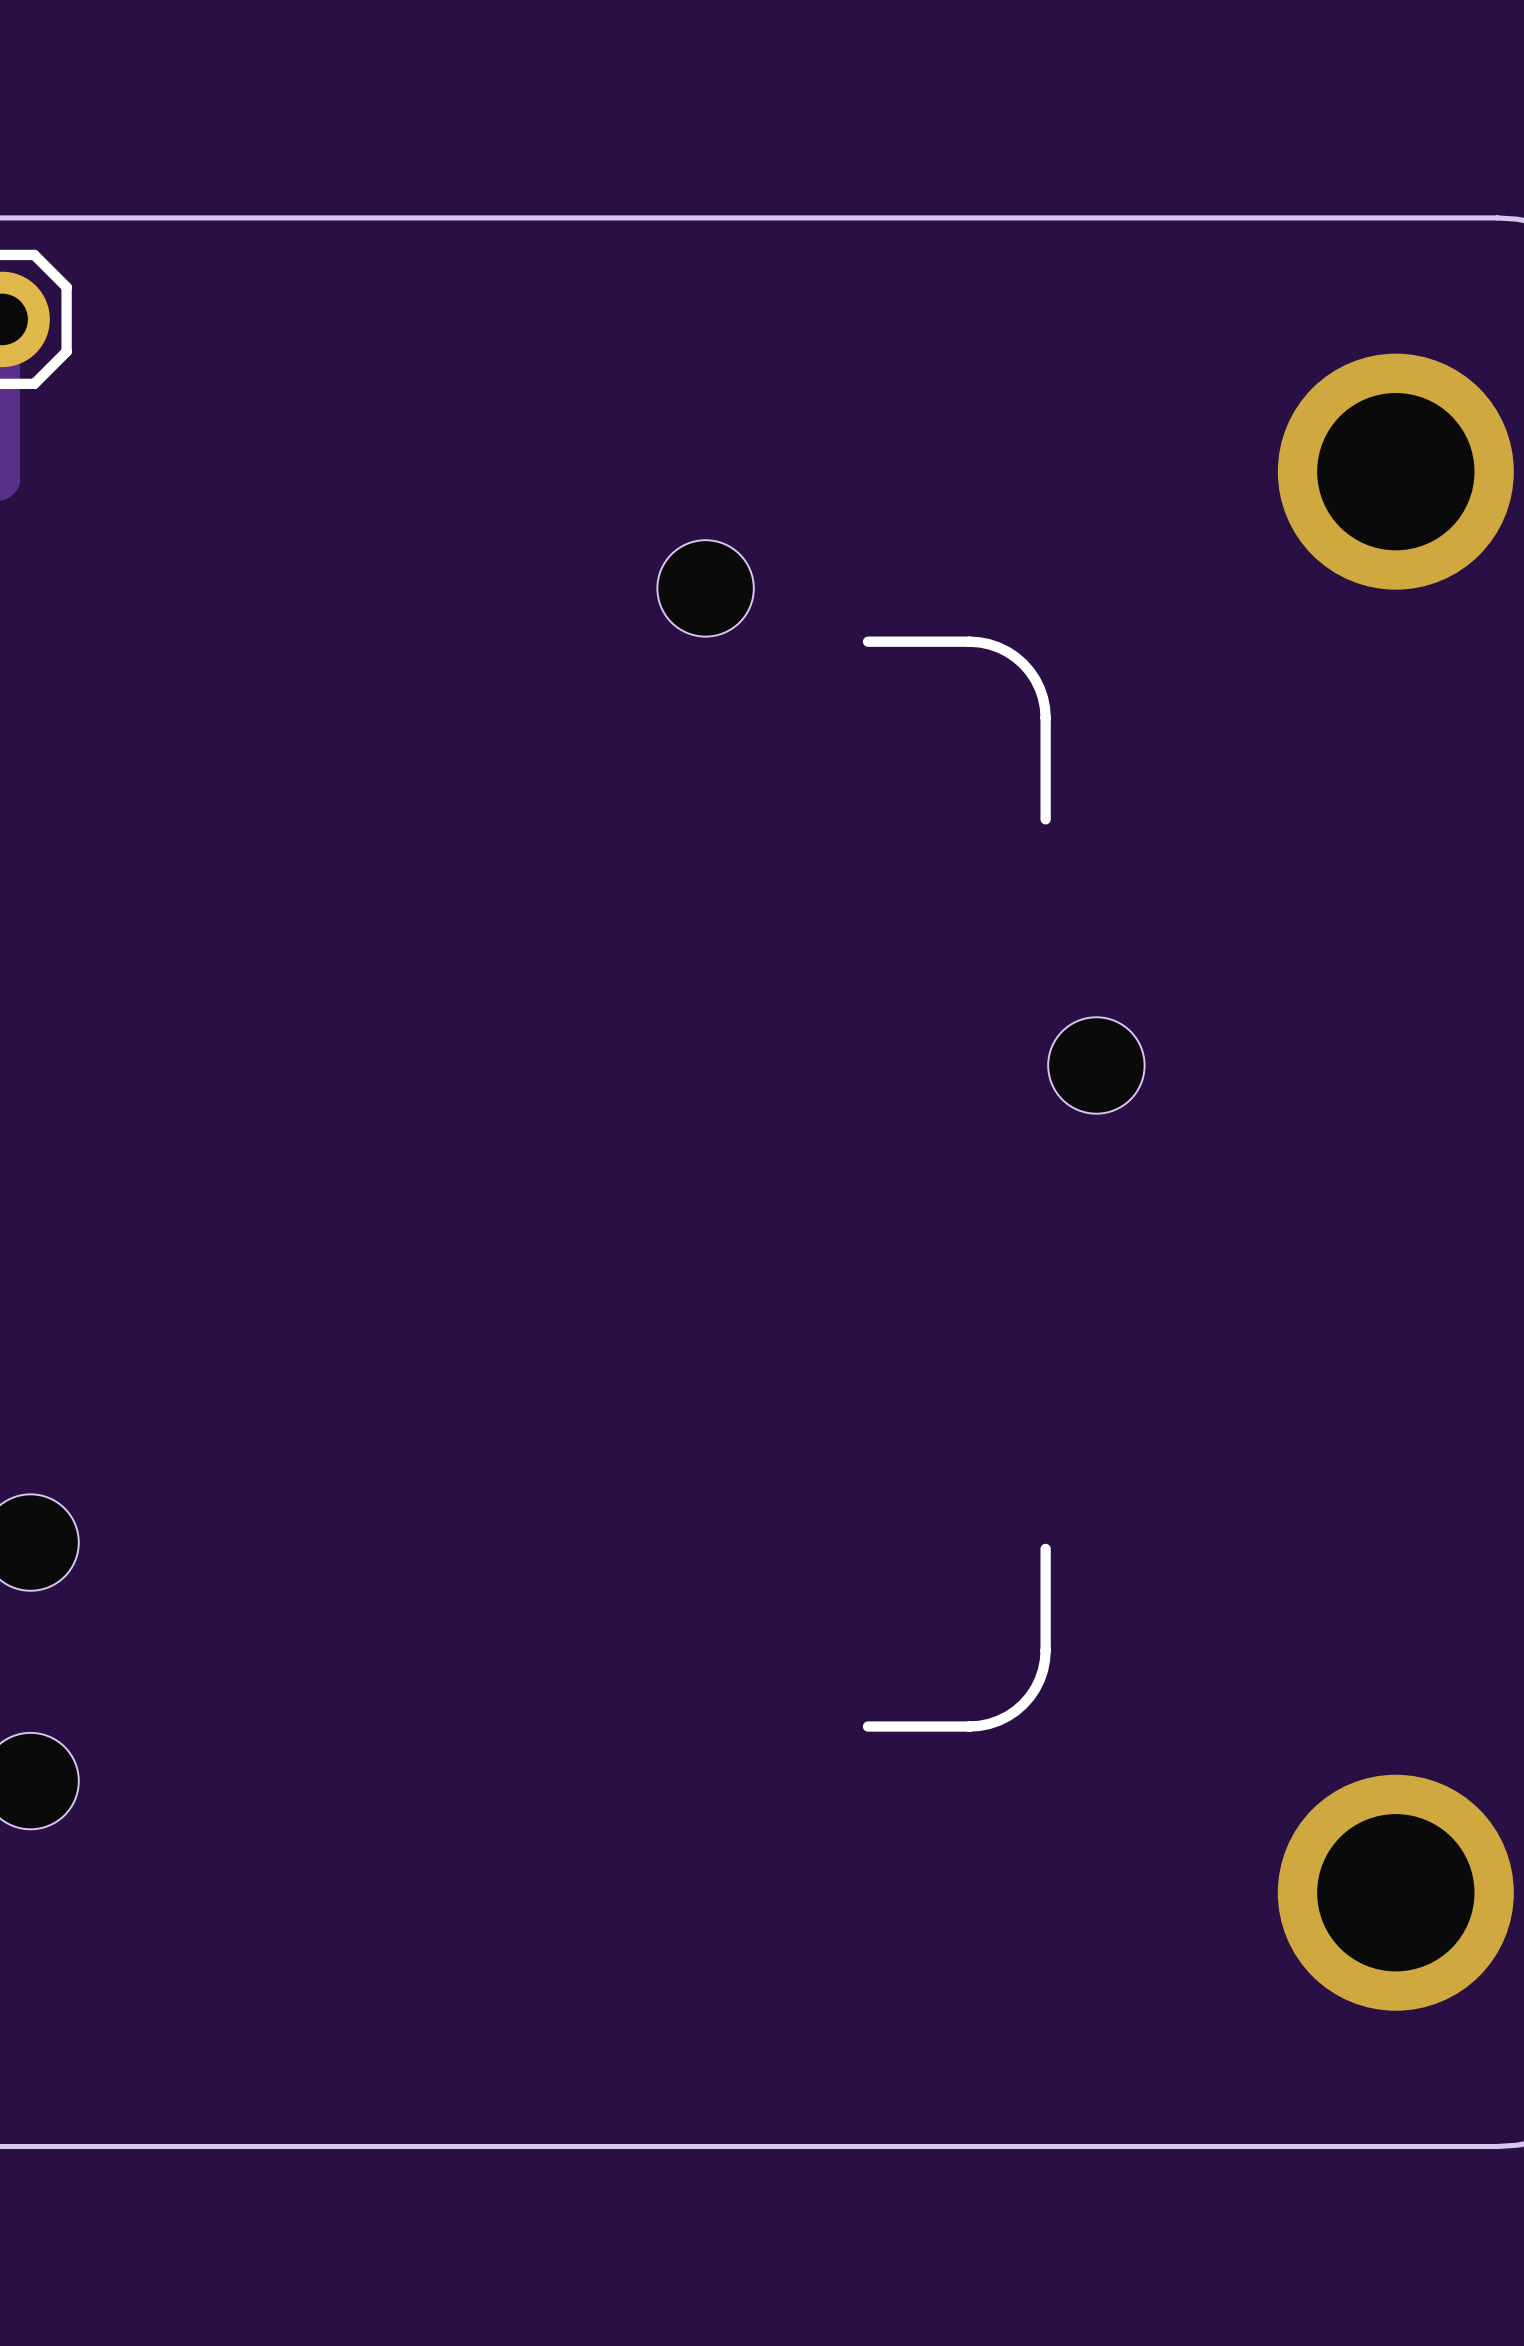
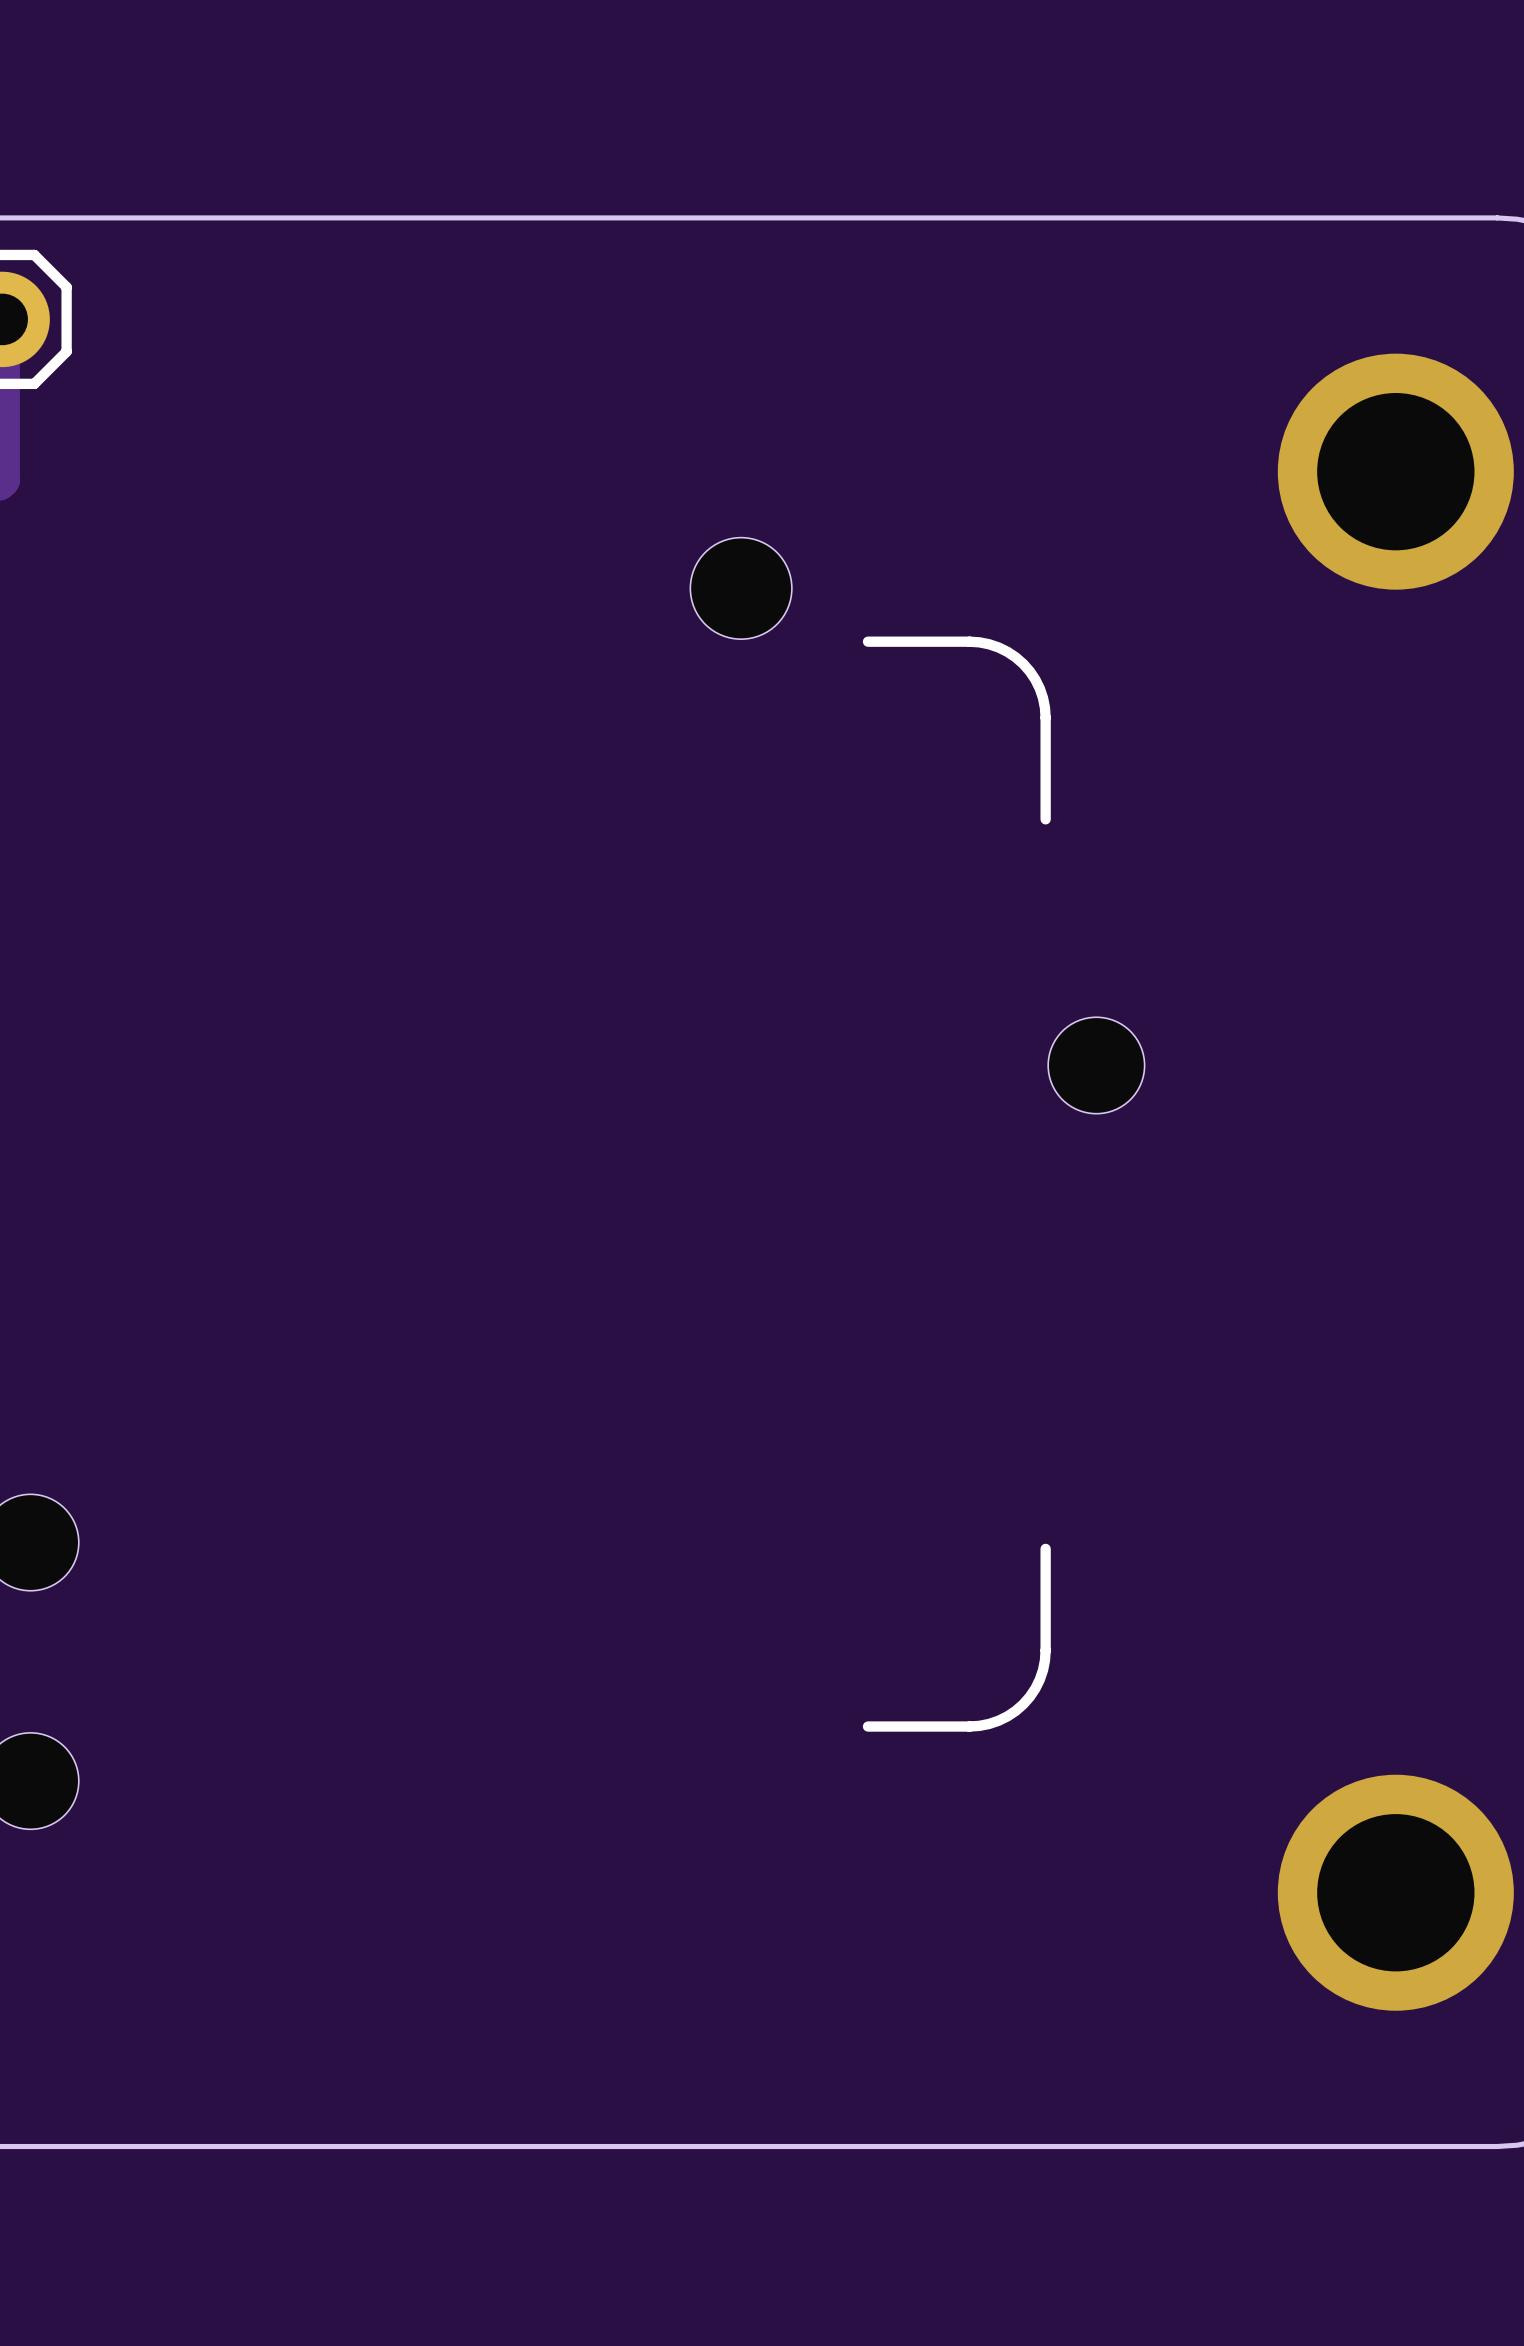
hole position: (705, 588) -> (741, 588)

